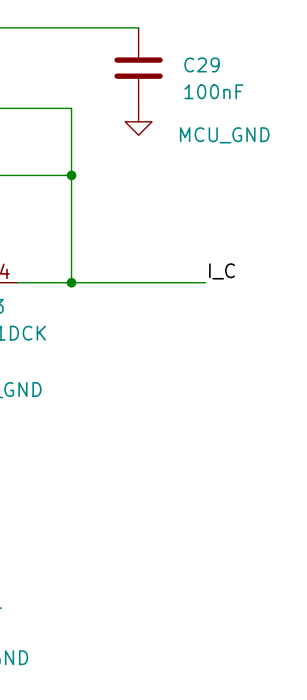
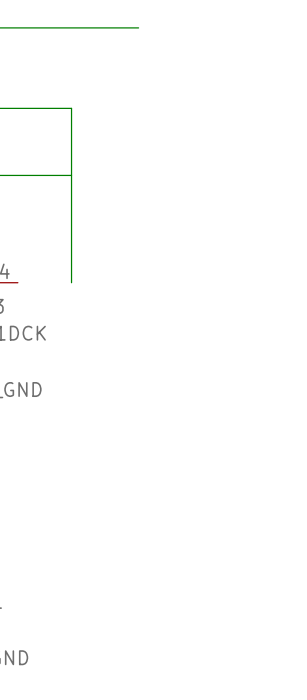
C29: 100nF (138, 68) -> none
power symbol: MCU_GND (138, 121) -> none
junction: (71, 175) -> none
label: I_C (222, 271) -> none
wire: (17, 282) (205, 282) -> none
junction: (71, 282) -> none

